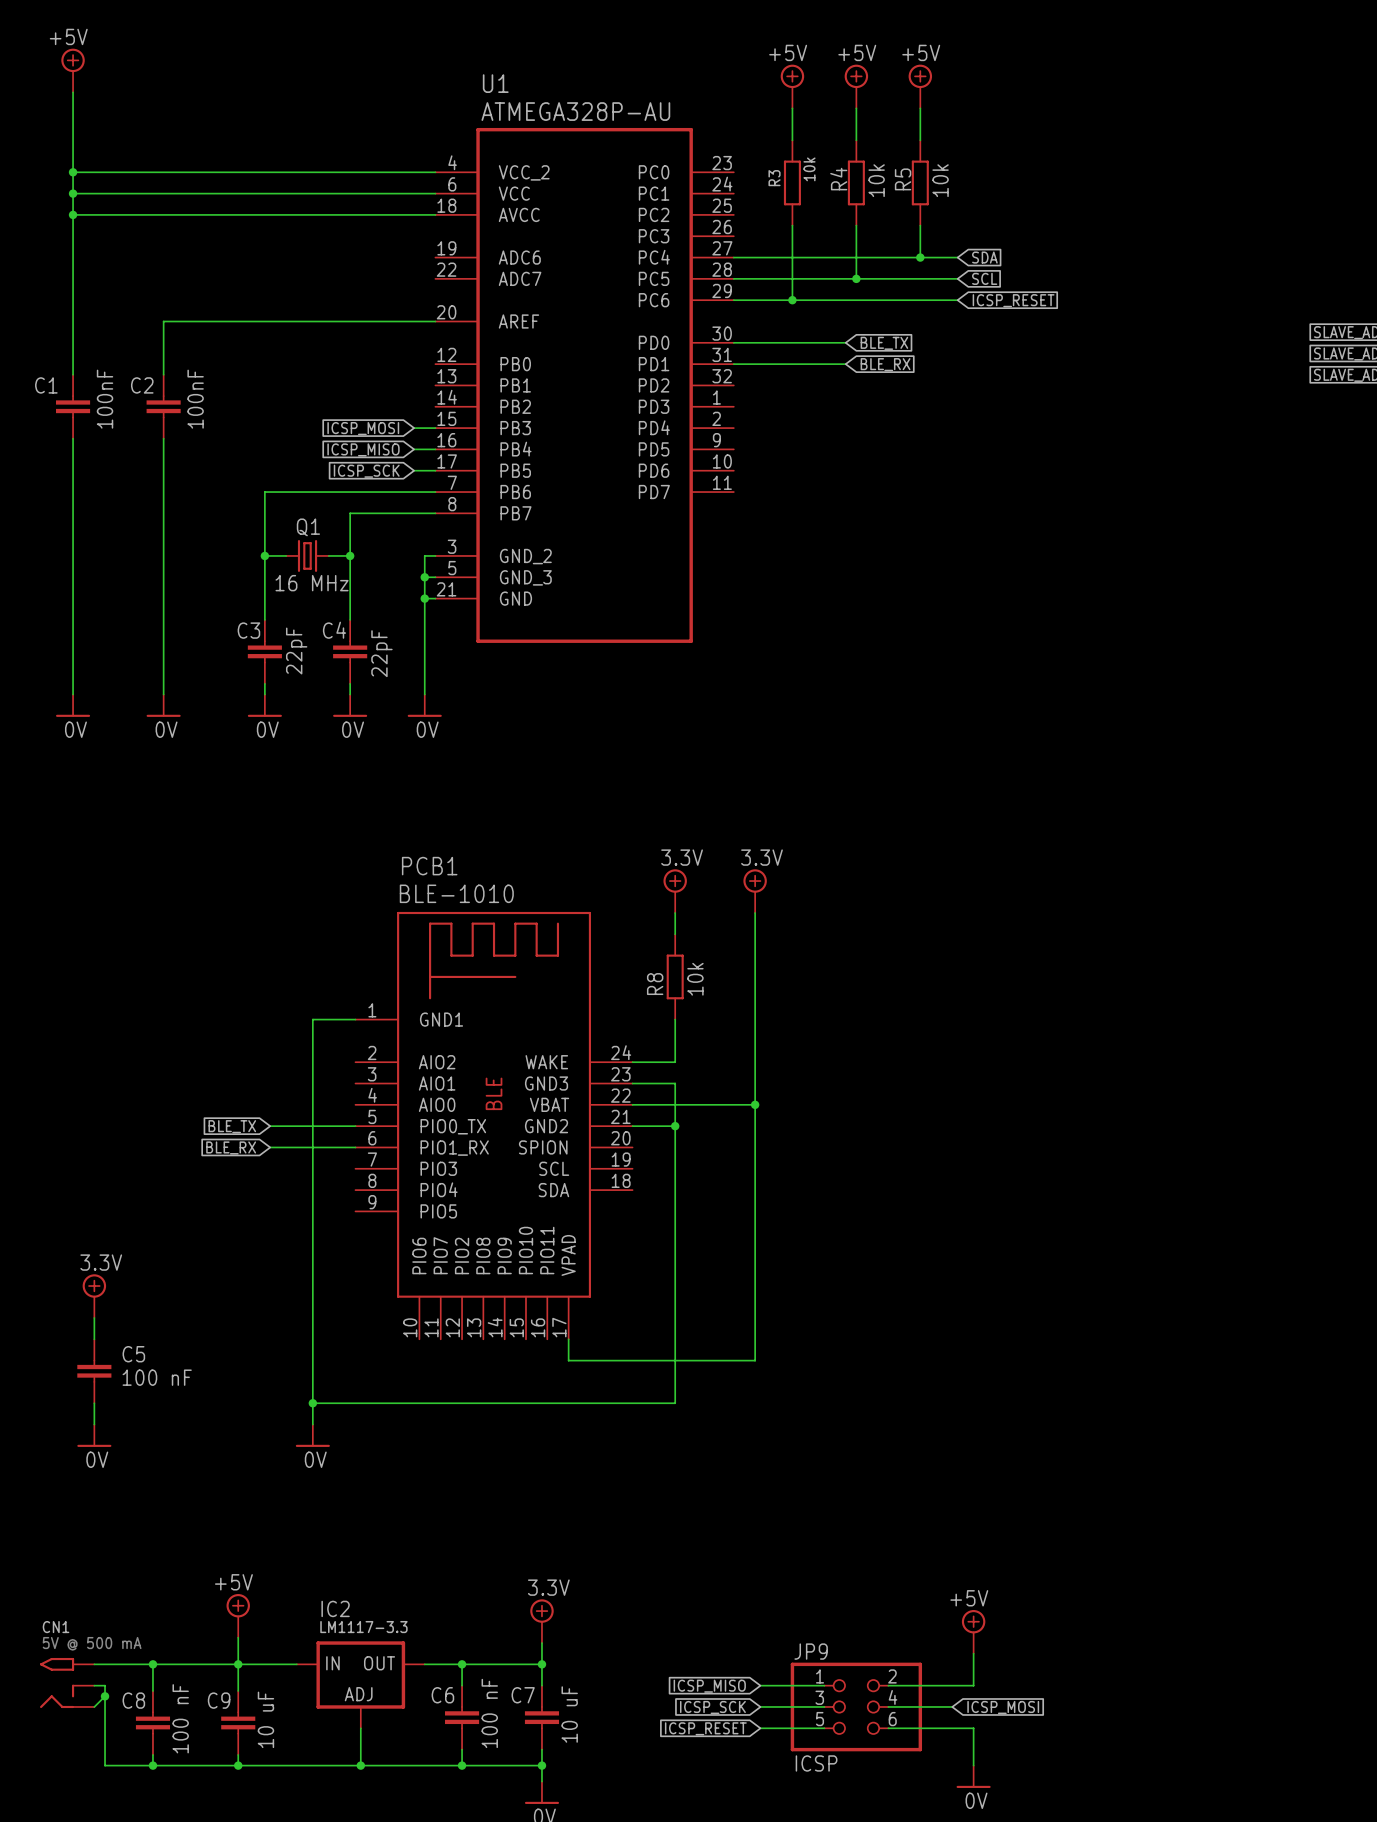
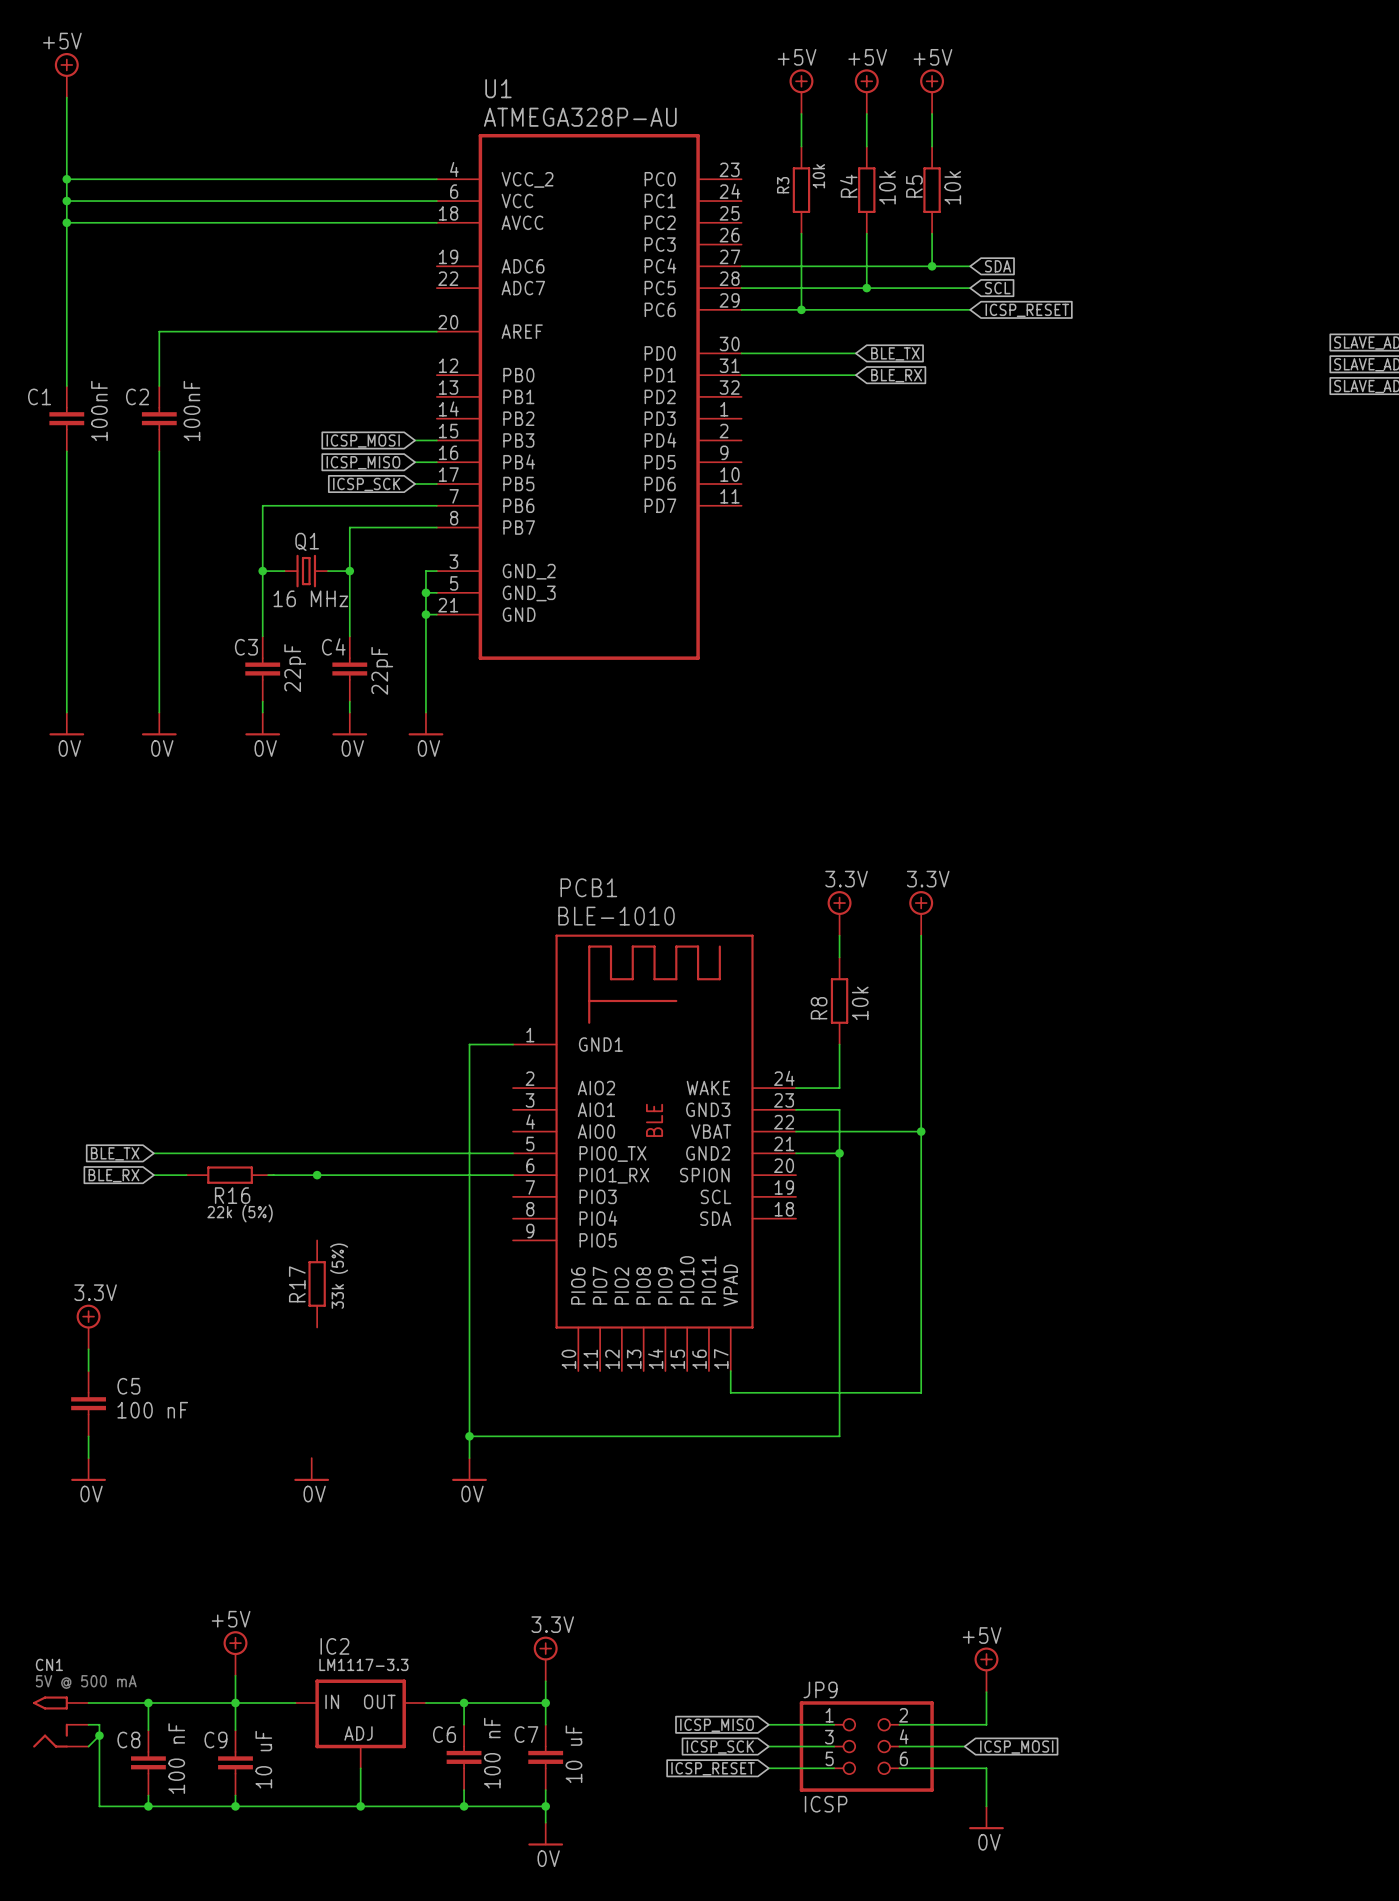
power symbol: 3.3V (675, 891) -> none
power symbol position: 3.3V (755, 891) -> 3.3V (839, 913)
power symbol: none -> 3.3V (921, 913)
wire: (675, 913) (675, 934) -> (839, 935) (839, 957)
wire: (755, 913) (755, 1360) -> (921, 1131) (921, 1392) (763, 1392)
wire: none -> (921, 935) (921, 1131)
R8 position: (675, 976) -> (839, 1000)
wire: (355, 1019) (312, 1019) (312, 1424) -> (513, 1044) (469, 1044) (469, 1458)
wire: (675, 1019) (675, 1062) (632, 1062) -> (839, 1044) (839, 1088) (796, 1088)
wire: (632, 1083) (675, 1083) (675, 1403) -> (796, 1109) (839, 1109) (839, 1436) (681, 1436)
wire: (632, 1104) (755, 1104) -> (796, 1131) (921, 1131)
junction: (755, 1104) -> none
junction: none -> (921, 1131)
PCB1 position: (494, 1125) -> (654, 1152)
wire: none -> (153, 1153) (268, 1153)
global label position: BLE_TX (232, 1126) -> BLE_TX (115, 1153)
wire: none -> (355, 1153) (513, 1153)
wire: (632, 1126) (675, 1126) -> (796, 1153) (839, 1153)
junction: (675, 1126) -> none
junction: none -> (839, 1153)
wire: none -> (153, 1175) (186, 1175)
global label position: BLE_RX (231, 1147) -> BLE_RX (113, 1175)
R16: none -> 22k (5%) (230, 1175)
junction: none -> (317, 1175)
wire: none -> (355, 1175) (513, 1175)
R17: none -> 33k (5%) (317, 1283)
wire: (568, 1339) (568, 1360) (723, 1360) -> (730, 1371) (730, 1392)
wire: (312, 1403) (467, 1403) -> none
junction: (312, 1403) -> none
junction: none -> (469, 1436)
power symbol: none -> 0V (469, 1469)

